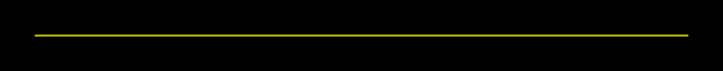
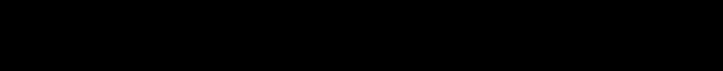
board edge: (35, 35) (687, 35) -> none

